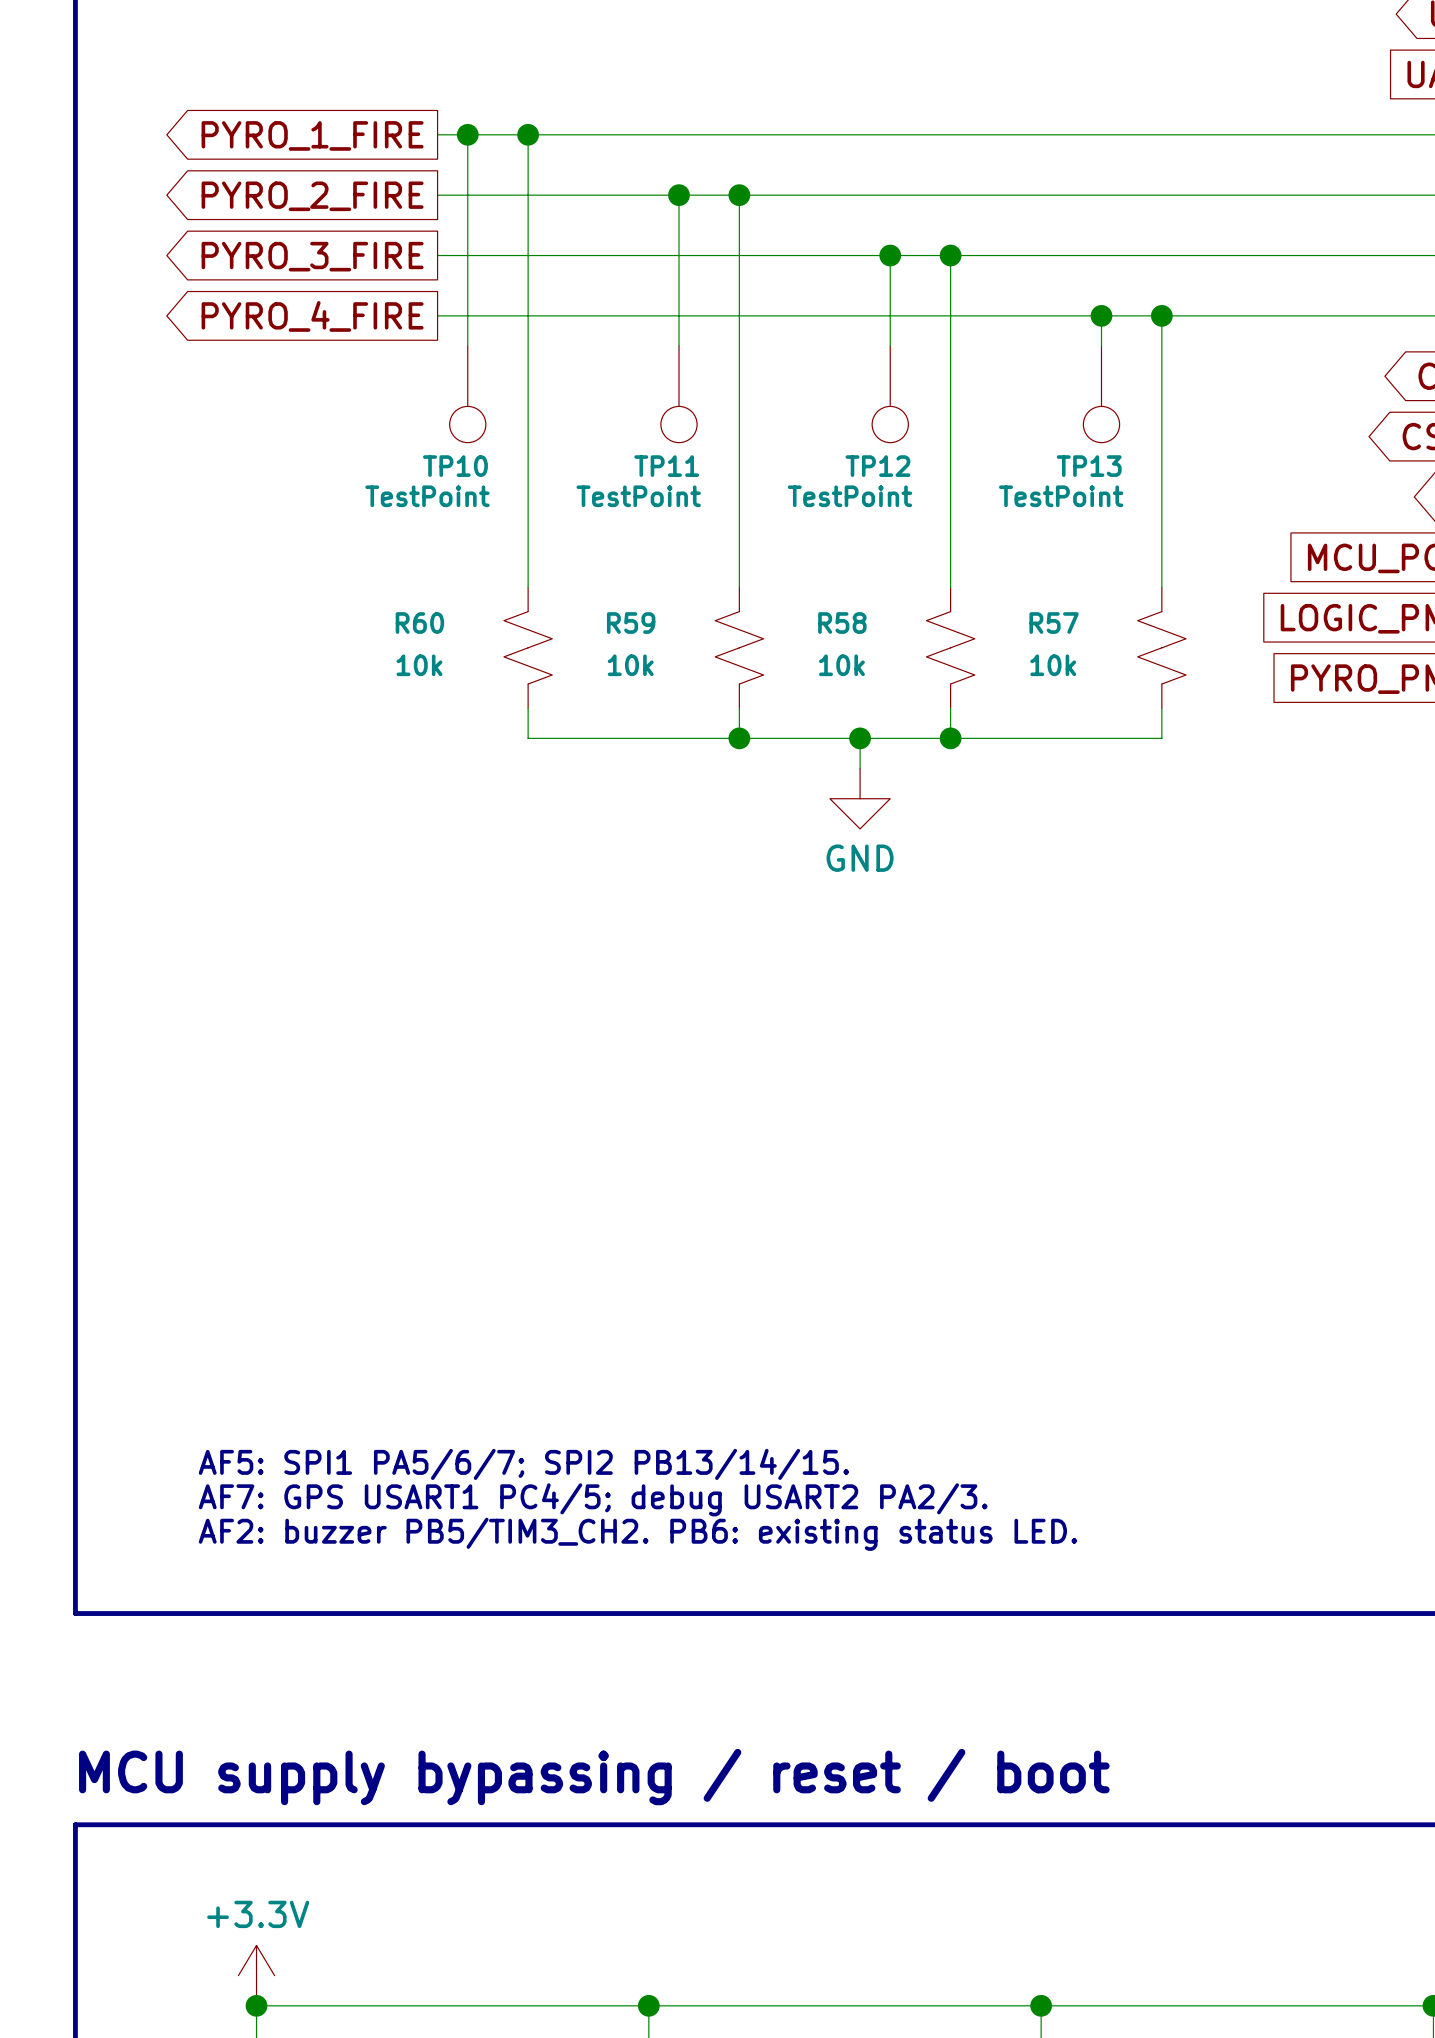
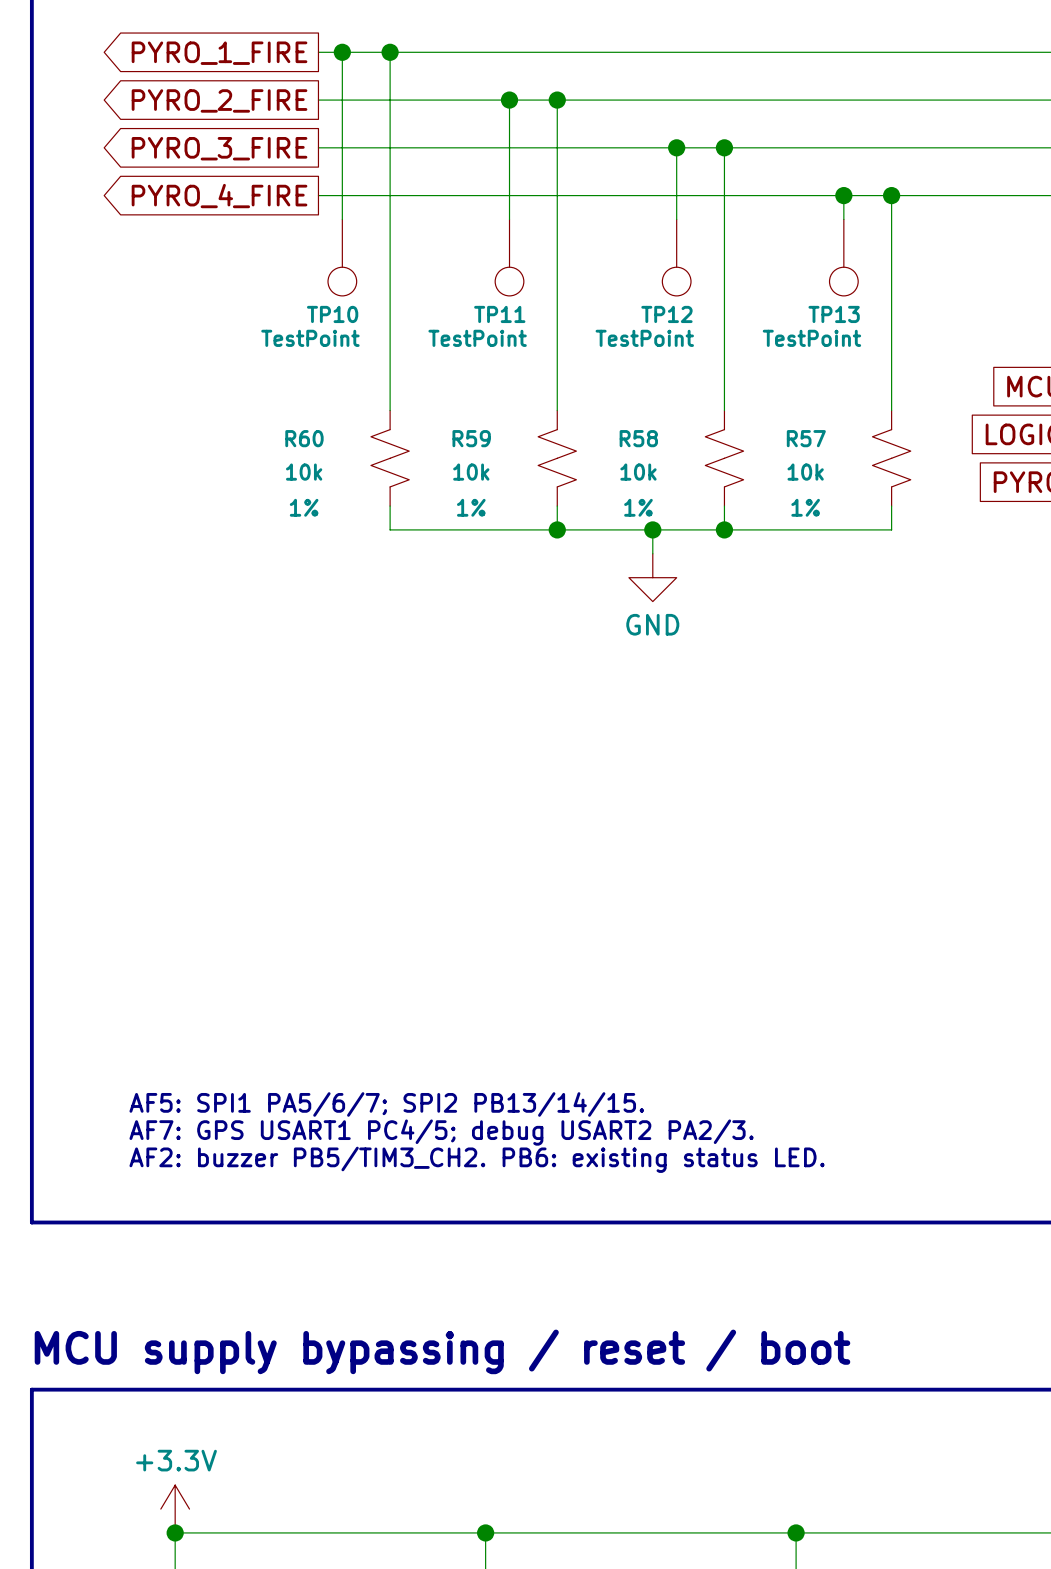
R60 text: none -> 1% (304, 507)
R59 text: none -> 1% (471, 507)
R58 text: none -> 1% (638, 507)
R57 text: none -> 1% (805, 507)

